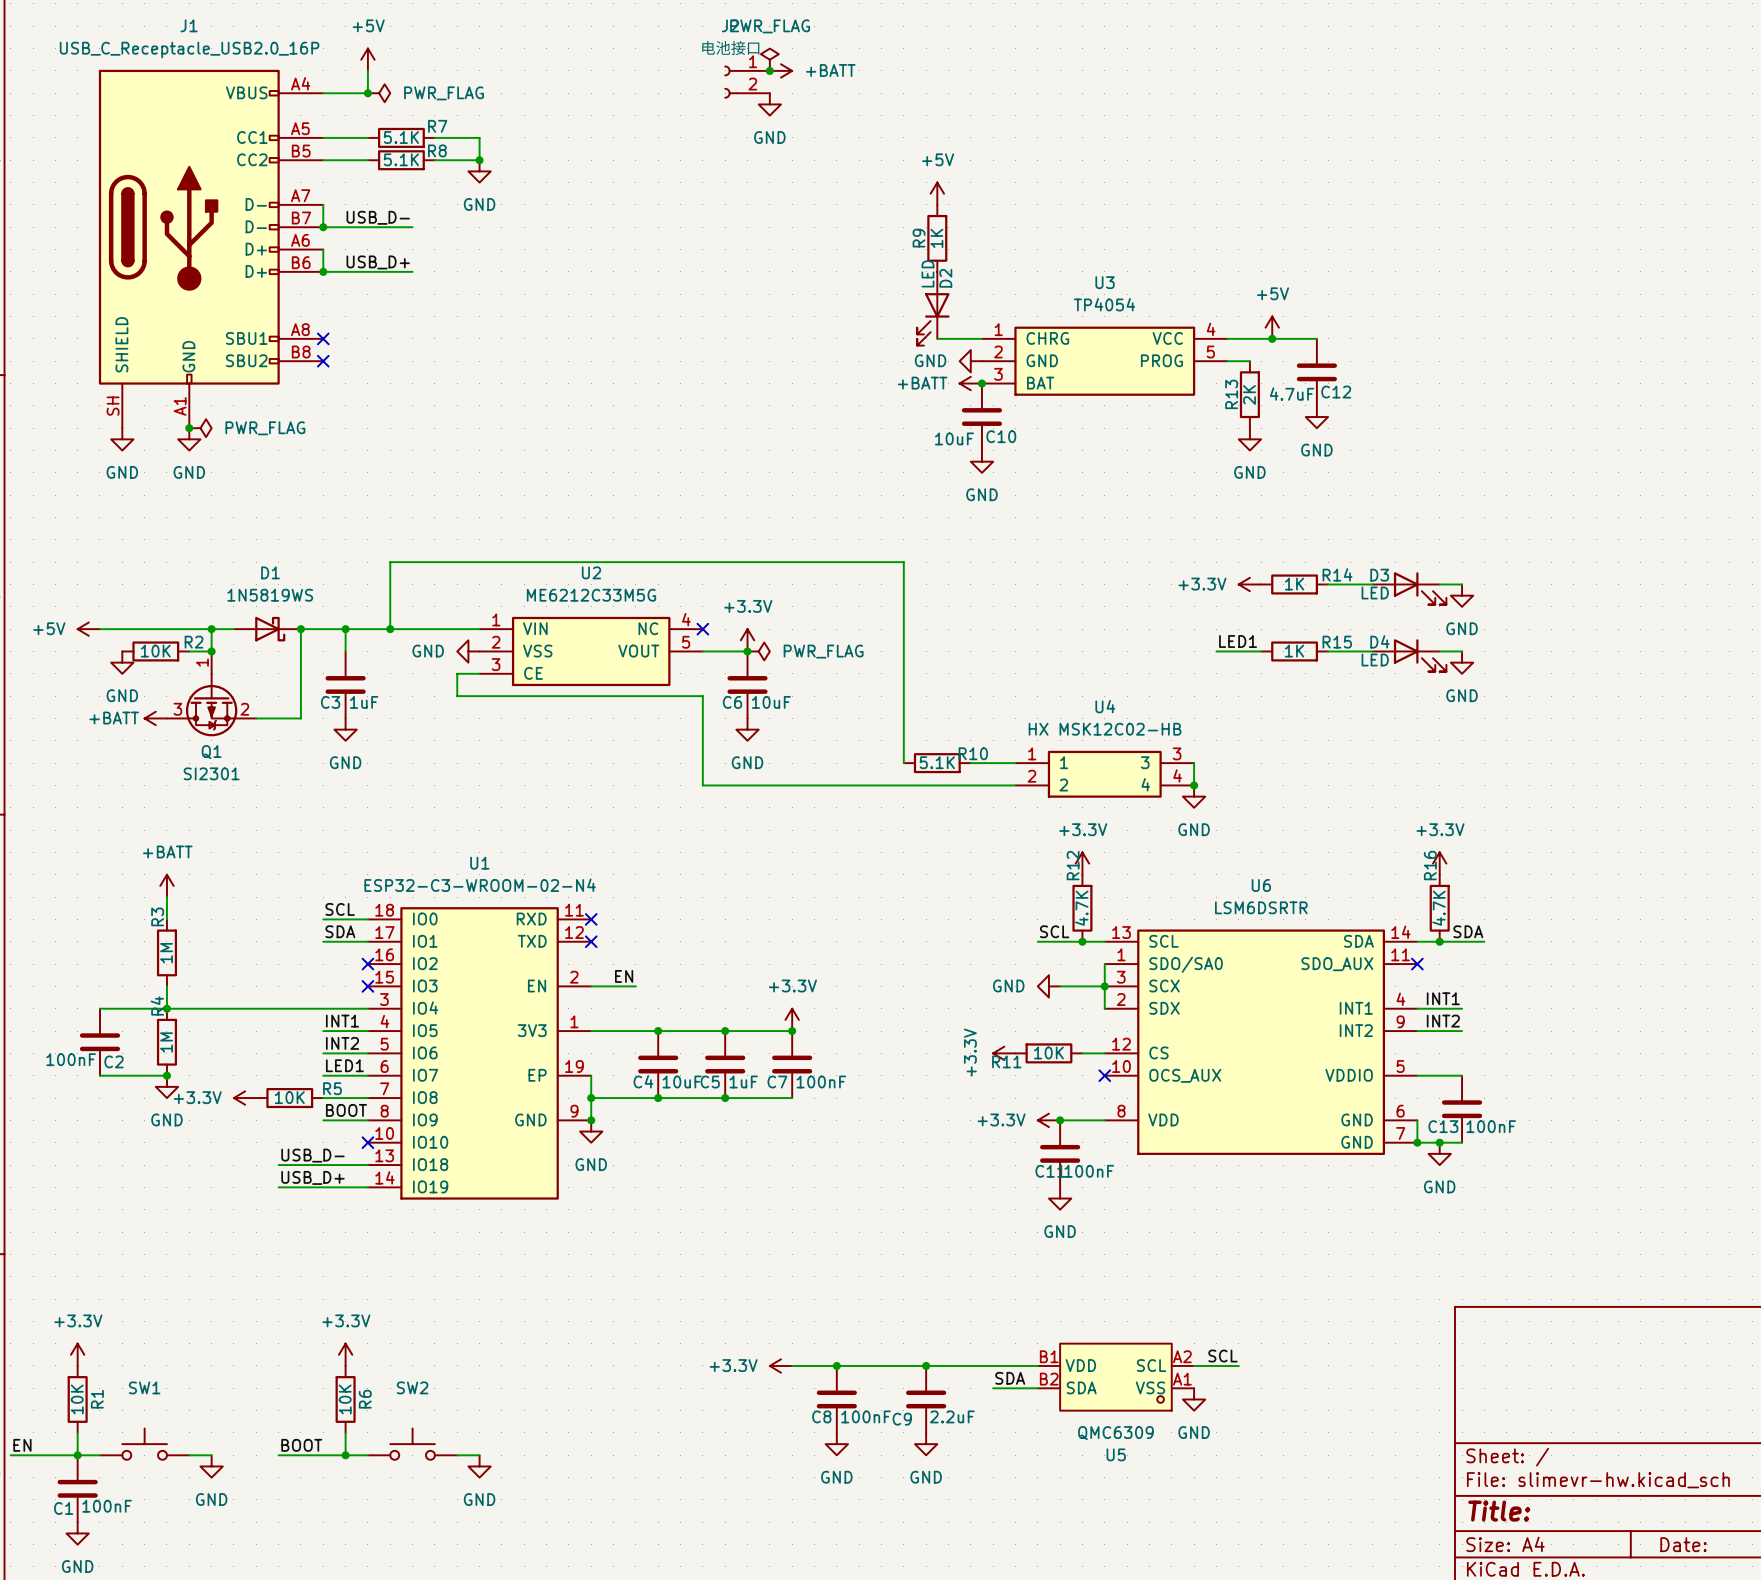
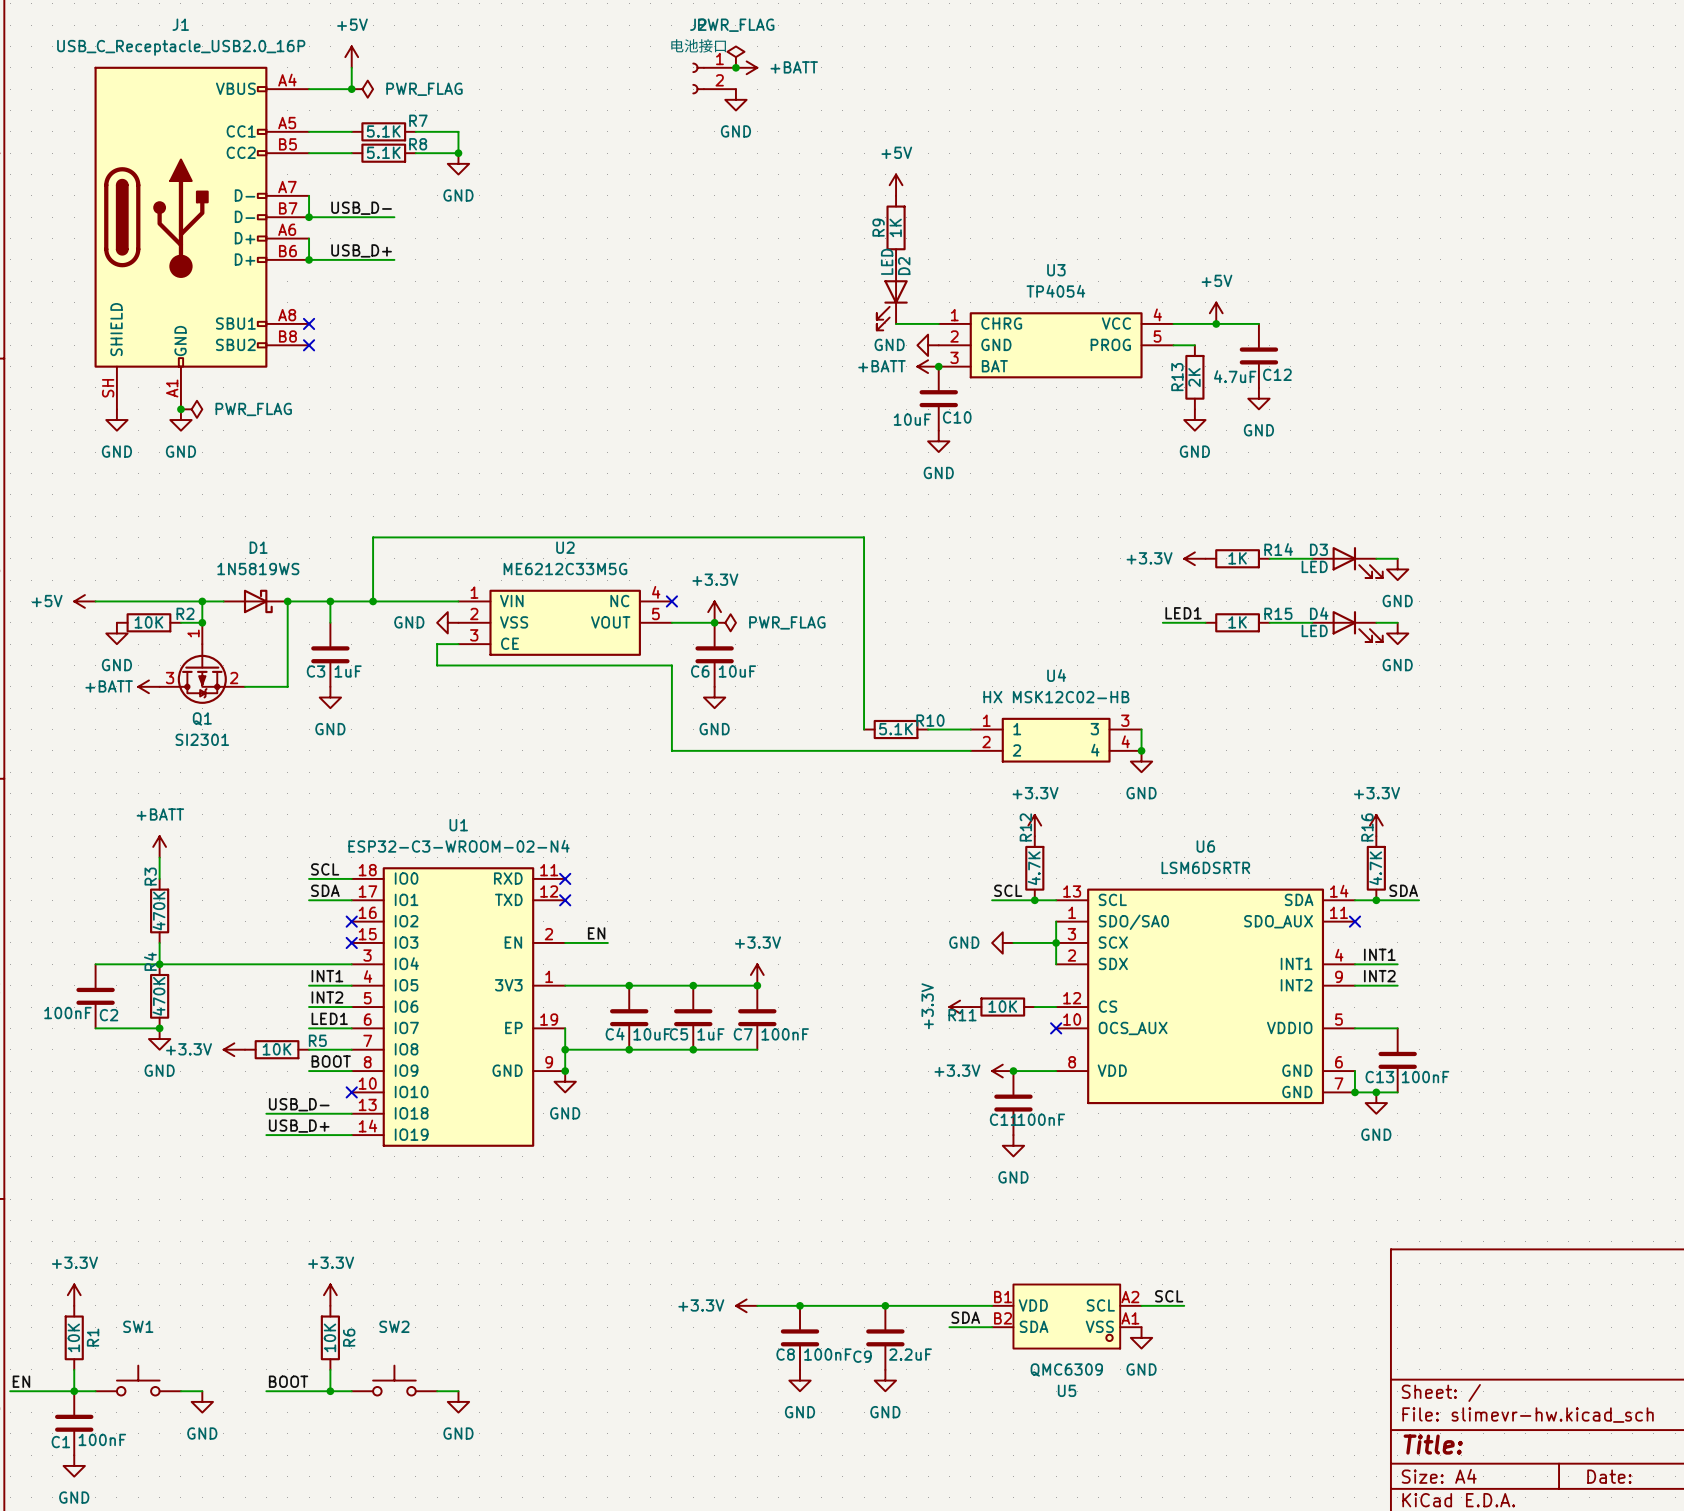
R3 value: 1M (166, 953) -> 470K (158, 910)
R4 value: 1M (166, 1042) -> 470K (158, 996)

